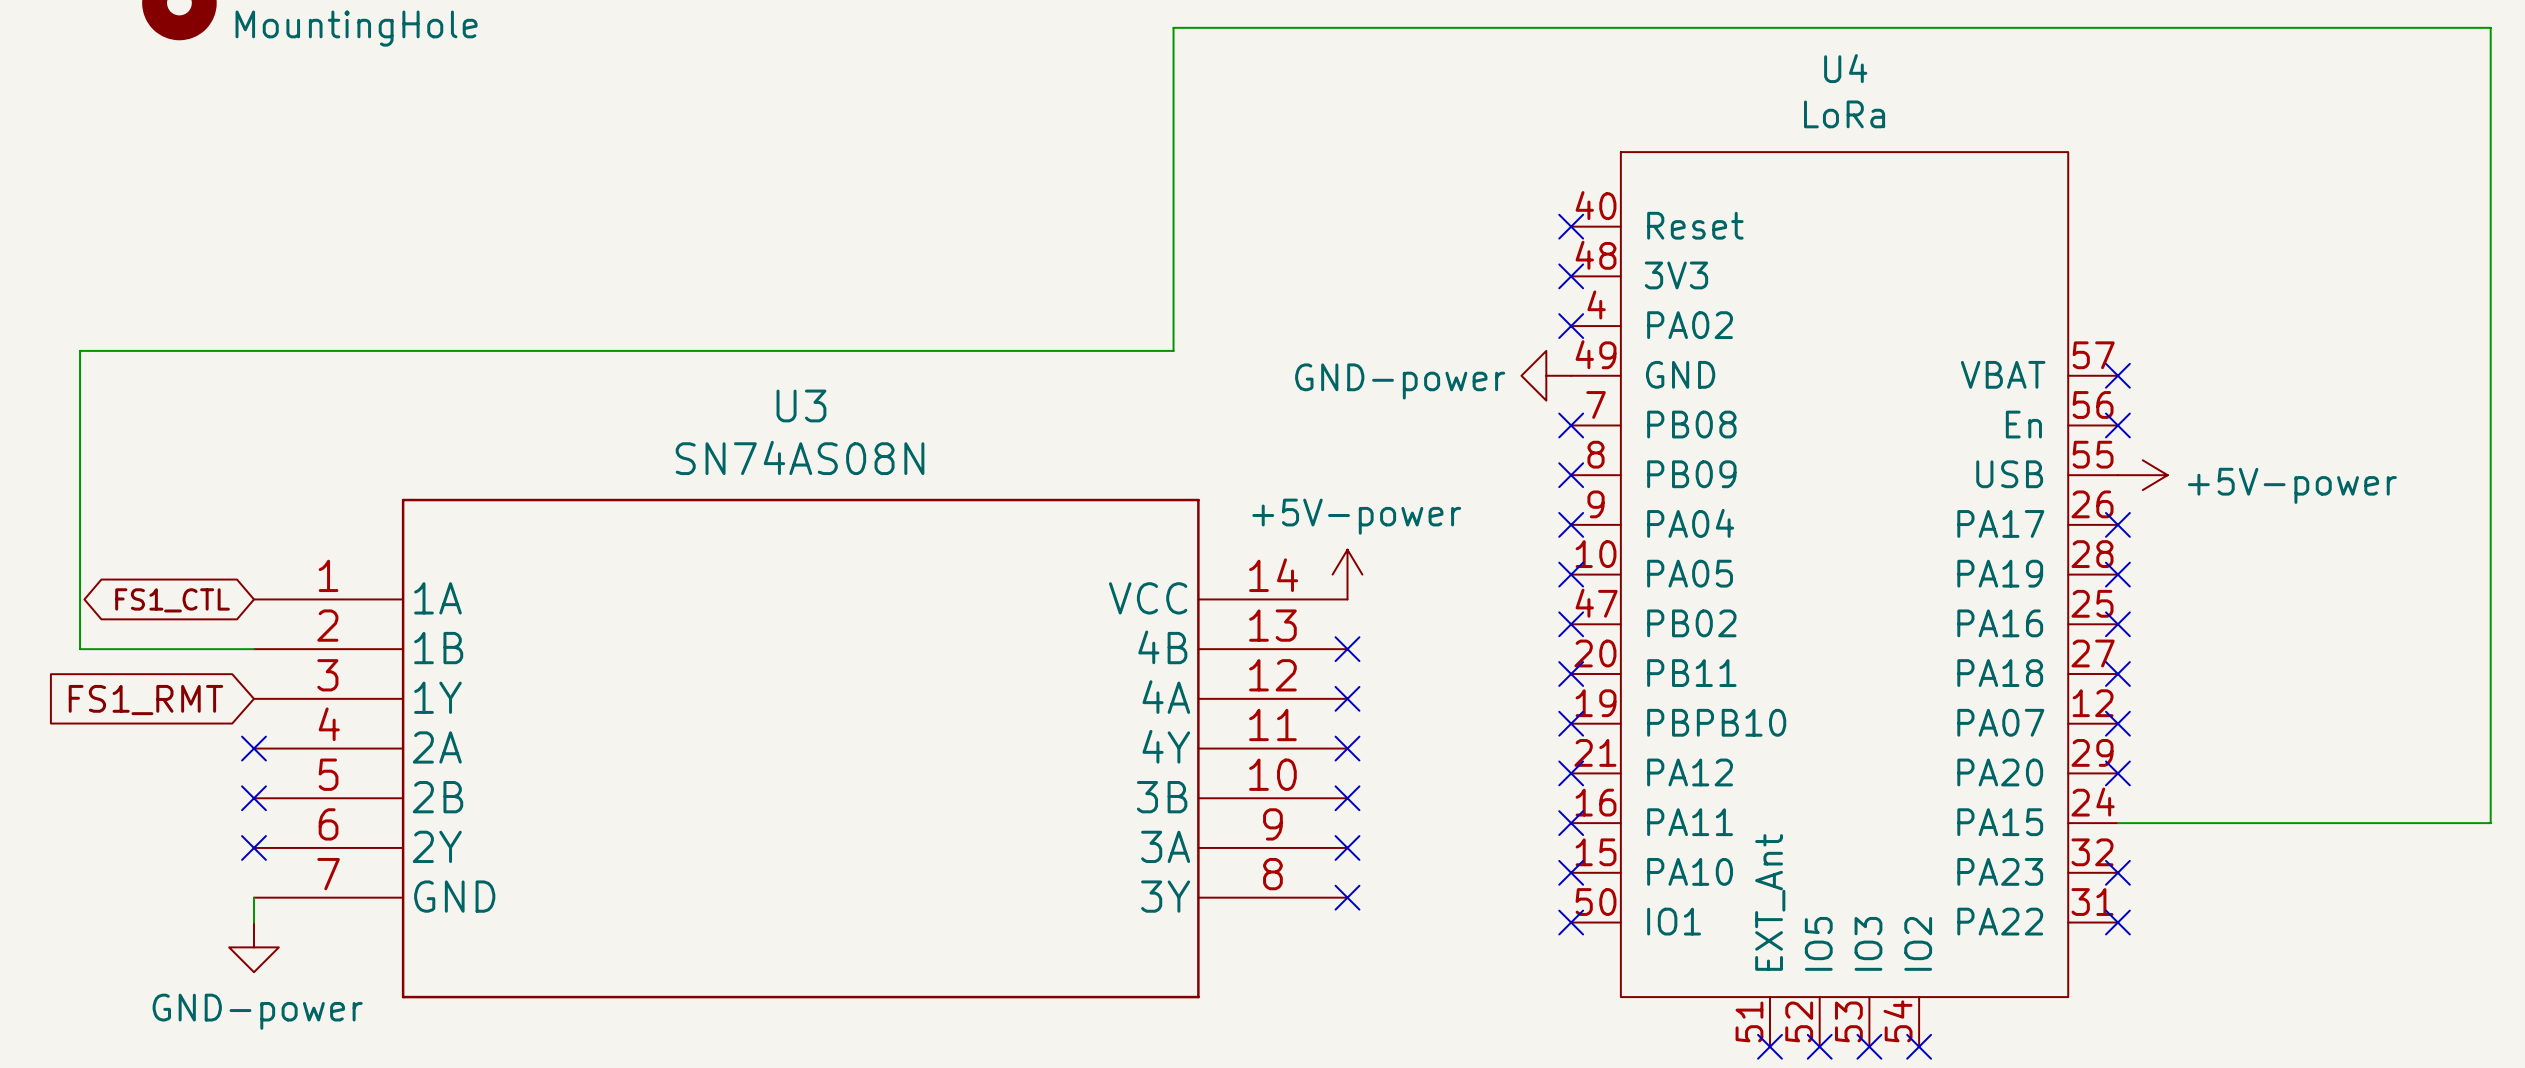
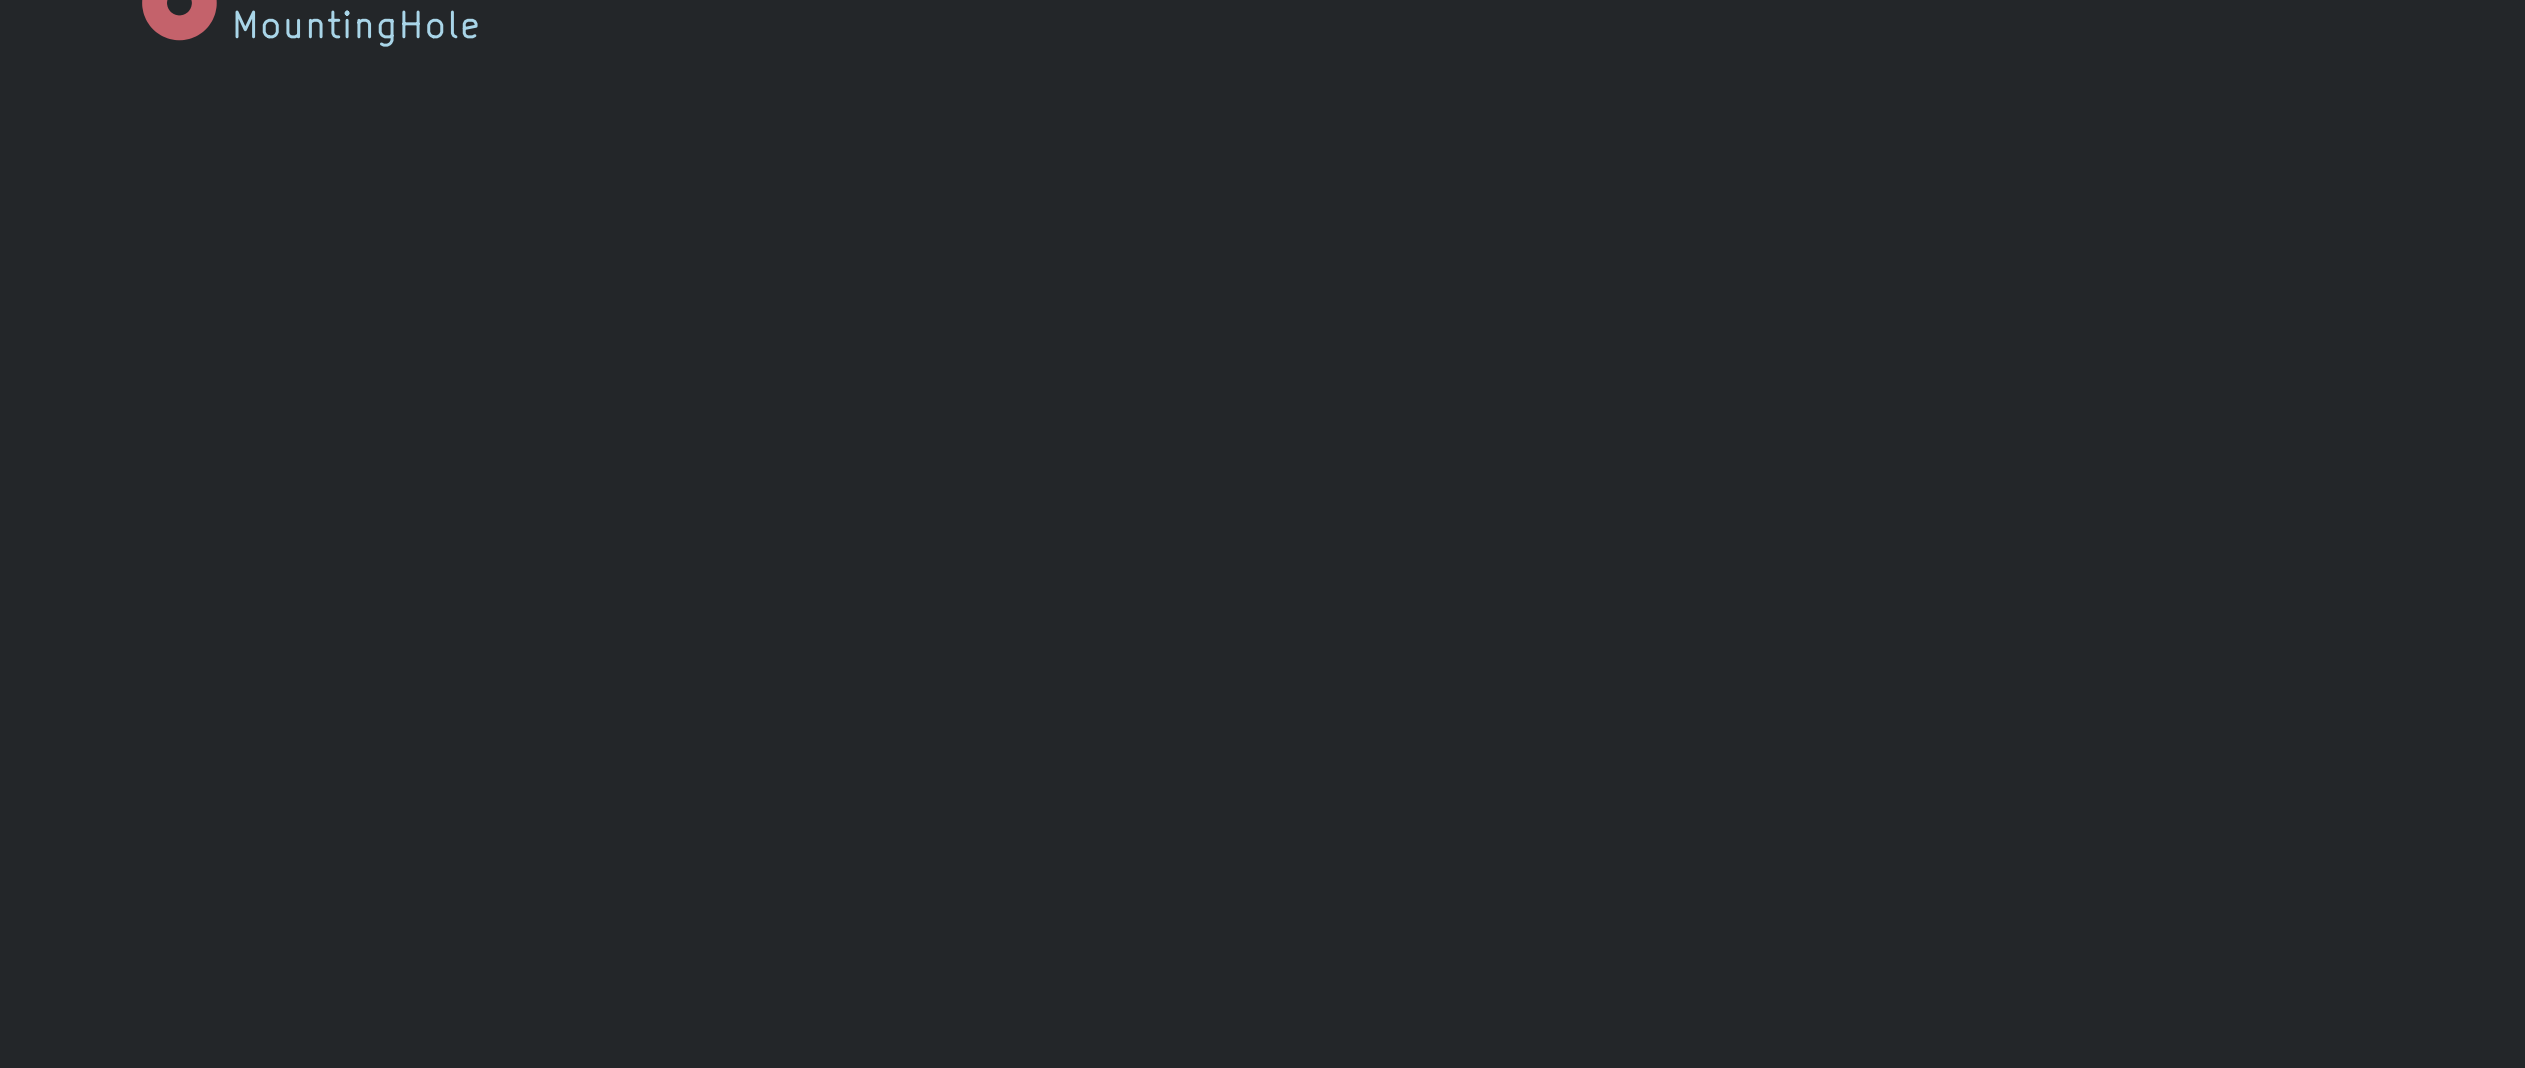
no-connect mark: (1571, 226) -> none
no-connect mark: (1571, 276) -> none
no-connect mark: (1571, 326) -> none
power symbol: GND-power (1546, 375) -> none
no-connect mark: (2117, 375) -> none
no-connect mark: (1571, 425) -> none
no-connect mark: (2117, 425) -> none
no-connect mark: (1571, 475) -> none
power symbol: +5V-power (2142, 475) -> none
no-connect mark: (1571, 524) -> none
no-connect mark: (2117, 524) -> none
power symbol: +5V-power (1347, 574) -> none
no-connect mark: (1571, 574) -> none
no-connect mark: (2117, 574) -> none
U4: LoRa (1844, 599) -> none
global label: FS1_CTL (172, 600) -> none
no-connect mark: (1571, 624) -> none
no-connect mark: (2117, 624) -> none
wire: (253, 649) (80, 649) (80, 350) (1173, 350) (1173, 27) (2490, 27) (2490, 823) (2117, 823) -> none
no-connect mark: (1347, 649) -> none
no-connect mark: (1571, 674) -> none
no-connect mark: (2117, 674) -> none
no-connect mark: (1347, 698) -> none
global label: FS1_RMT (145, 700) -> none
no-connect mark: (1571, 723) -> none
no-connect mark: (2117, 723) -> none
no-connect mark: (253, 748) -> none
U3: SN74AS08N (800, 748) -> none
no-connect mark: (1347, 748) -> none
no-connect mark: (1571, 773) -> none
no-connect mark: (2117, 773) -> none
no-connect mark: (253, 798) -> none
no-connect mark: (1347, 798) -> none
no-connect mark: (1571, 823) -> none
no-connect mark: (253, 847) -> none
no-connect mark: (1347, 847) -> none
no-connect mark: (1571, 872) -> none
no-connect mark: (2117, 872) -> none
wire: (253, 897) (253, 922) -> none
no-connect mark: (1347, 897) -> none
no-connect mark: (1571, 922) -> none
no-connect mark: (2117, 922) -> none
power symbol: GND-power (253, 947) -> none
no-connect mark: (1769, 1046) -> none
no-connect mark: (1819, 1046) -> none
no-connect mark: (1869, 1046) -> none
no-connect mark: (1919, 1046) -> none

